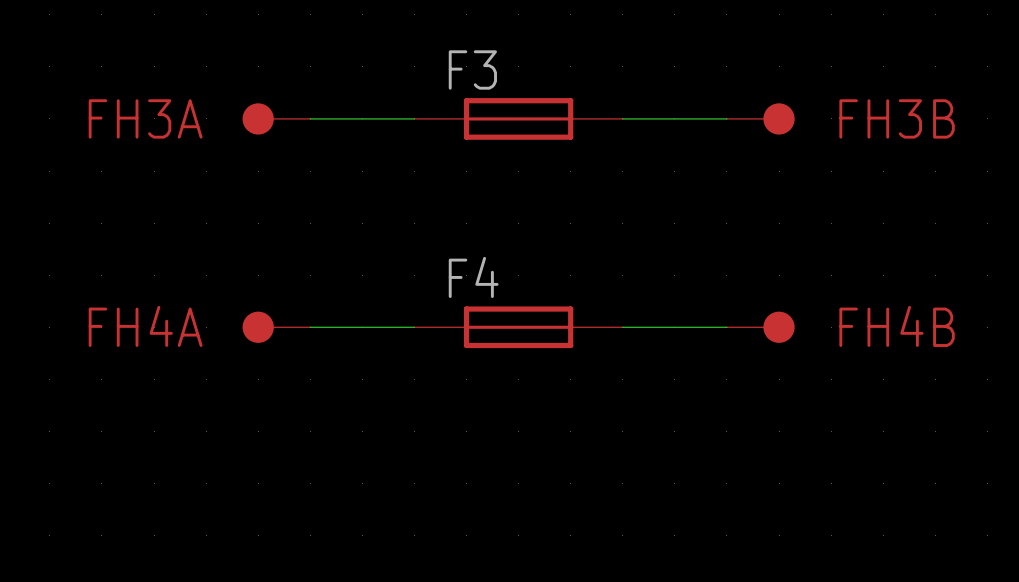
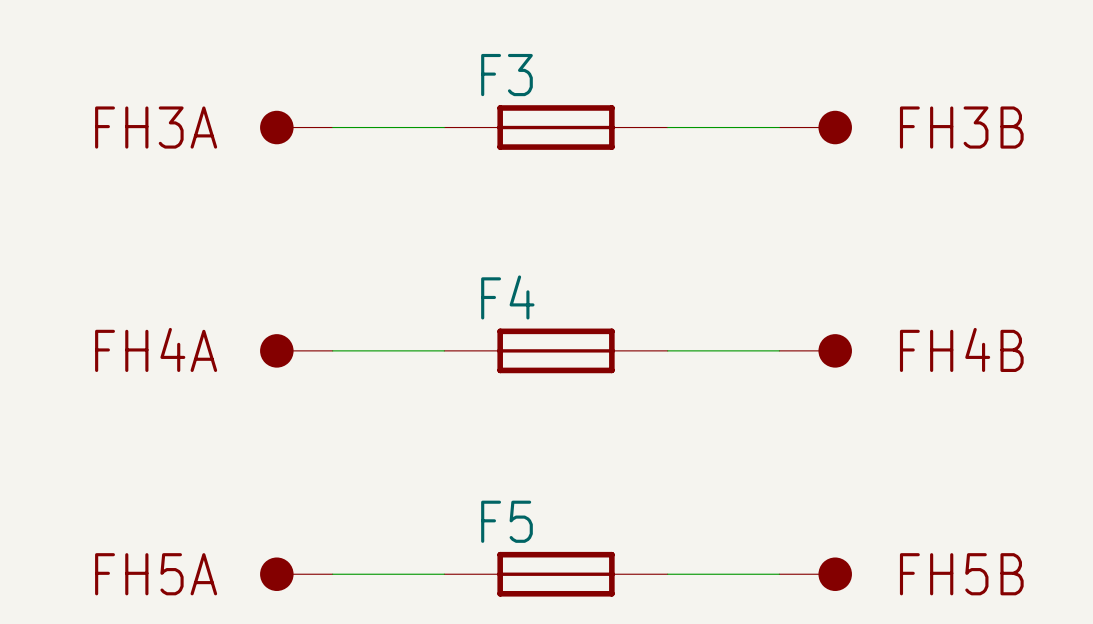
FH5A: none -> (296, 574)
wire: none -> (332, 574) (444, 574)
F5: none -> (556, 574)
wire: none -> (667, 574) (779, 574)
FH5B: none -> (815, 574)

